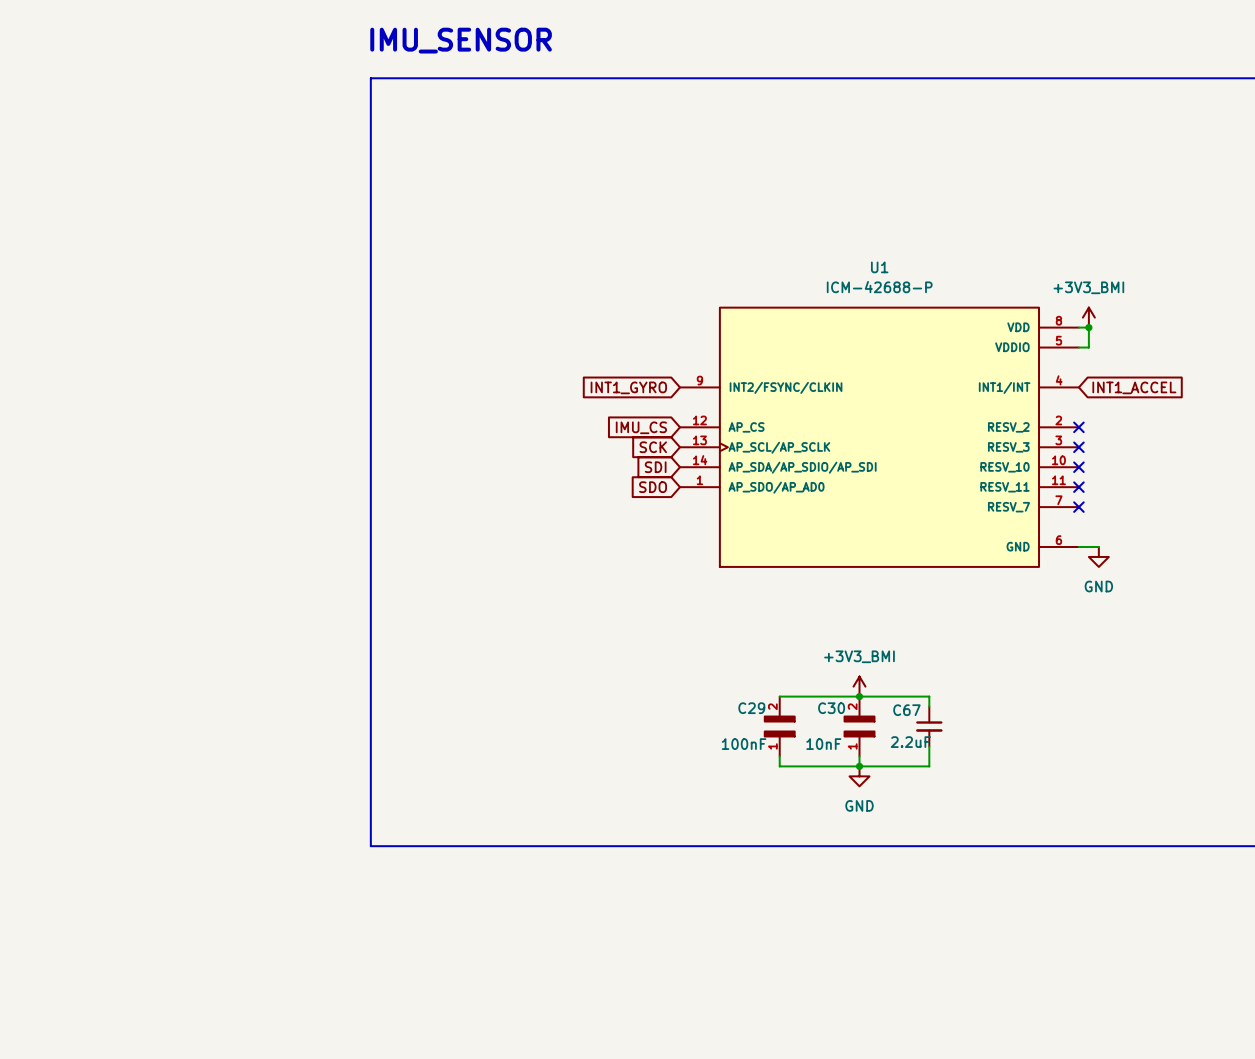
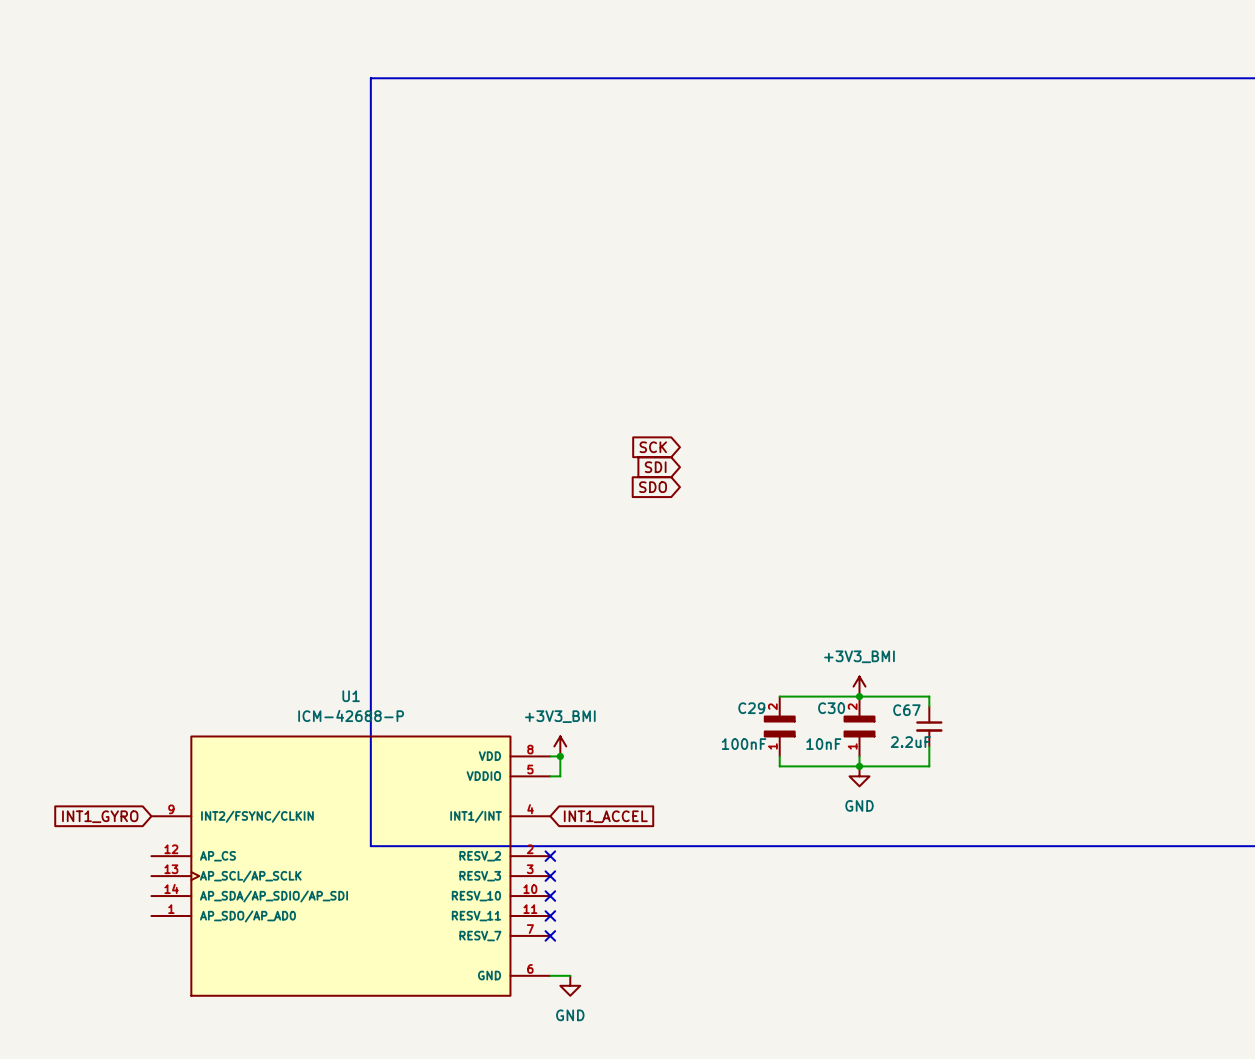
text: IMU_SENSOR (461, 40) -> none
power symbol: +3V3_BMI (1088, 317) -> none
wire: (1078, 327) (1088, 327) (1088, 347) (1078, 347) -> none
junction: (1088, 327) -> none
global label: INT1_GYRO (628, 387) -> none
global label: INT1_ACCEL (1134, 387) -> none
global label: IMU_CS (641, 427) -> none
no-connect mark: (1078, 427) -> none
U1 position: (879, 437) -> (350, 866)
no-connect mark: (1078, 447) -> none
no-connect mark: (1078, 467) -> none
no-connect mark: (1078, 487) -> none
no-connect mark: (1078, 507) -> none
wire: (1078, 546) (1098, 546) -> none
power symbol: GND (1098, 556) -> none
power symbol: none -> +3V3_BMI (560, 746)
wire: none -> (550, 756) (560, 756) (560, 776) (550, 776)
junction: none -> (560, 756)
global label: none -> INT1_GYRO (100, 816)
global label: none -> INT1_ACCEL (605, 816)
no-connect mark: none -> (550, 856)
no-connect mark: none -> (550, 876)
no-connect mark: none -> (550, 896)
no-connect mark: none -> (550, 915)
no-connect mark: none -> (550, 935)
wire: none -> (550, 975) (570, 975)
power symbol: none -> GND (570, 985)

